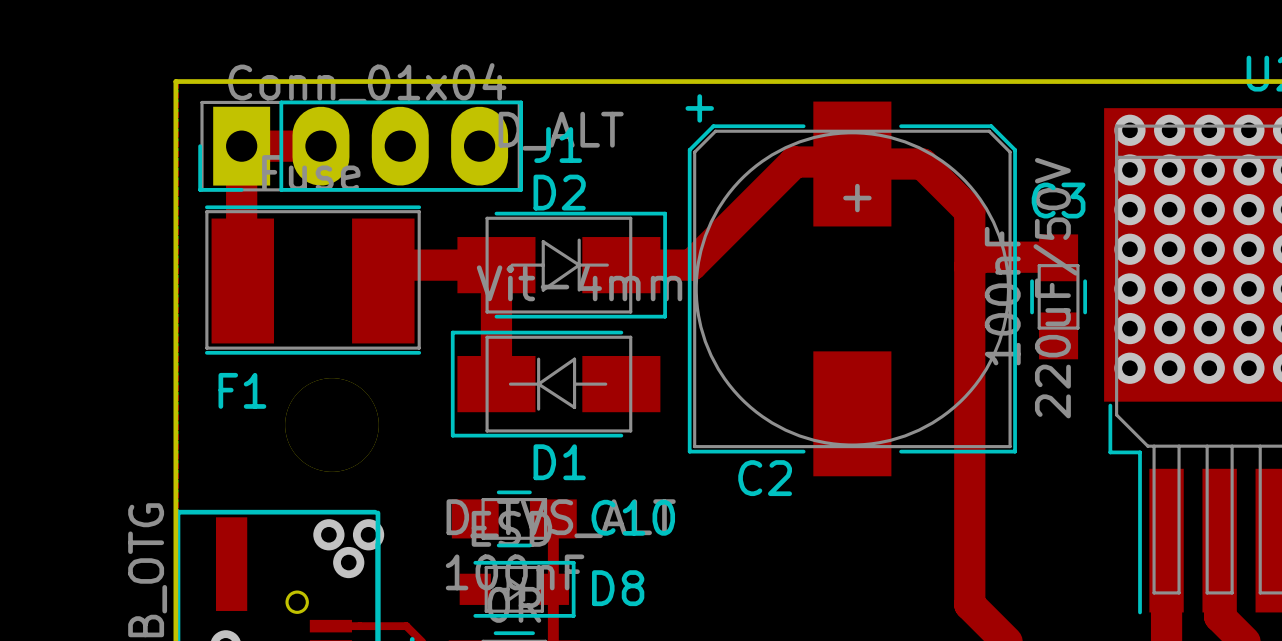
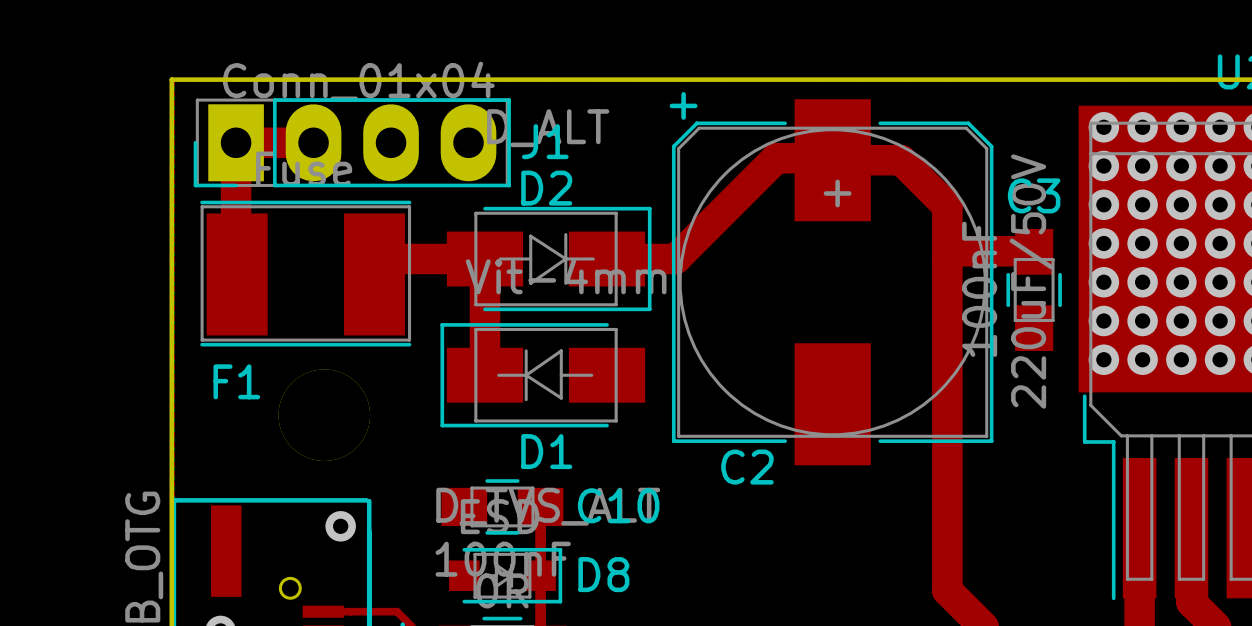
via: (328, 534) -> none
via: (368, 534) -> none
via: none -> (340, 526)
via: (348, 562) -> none

